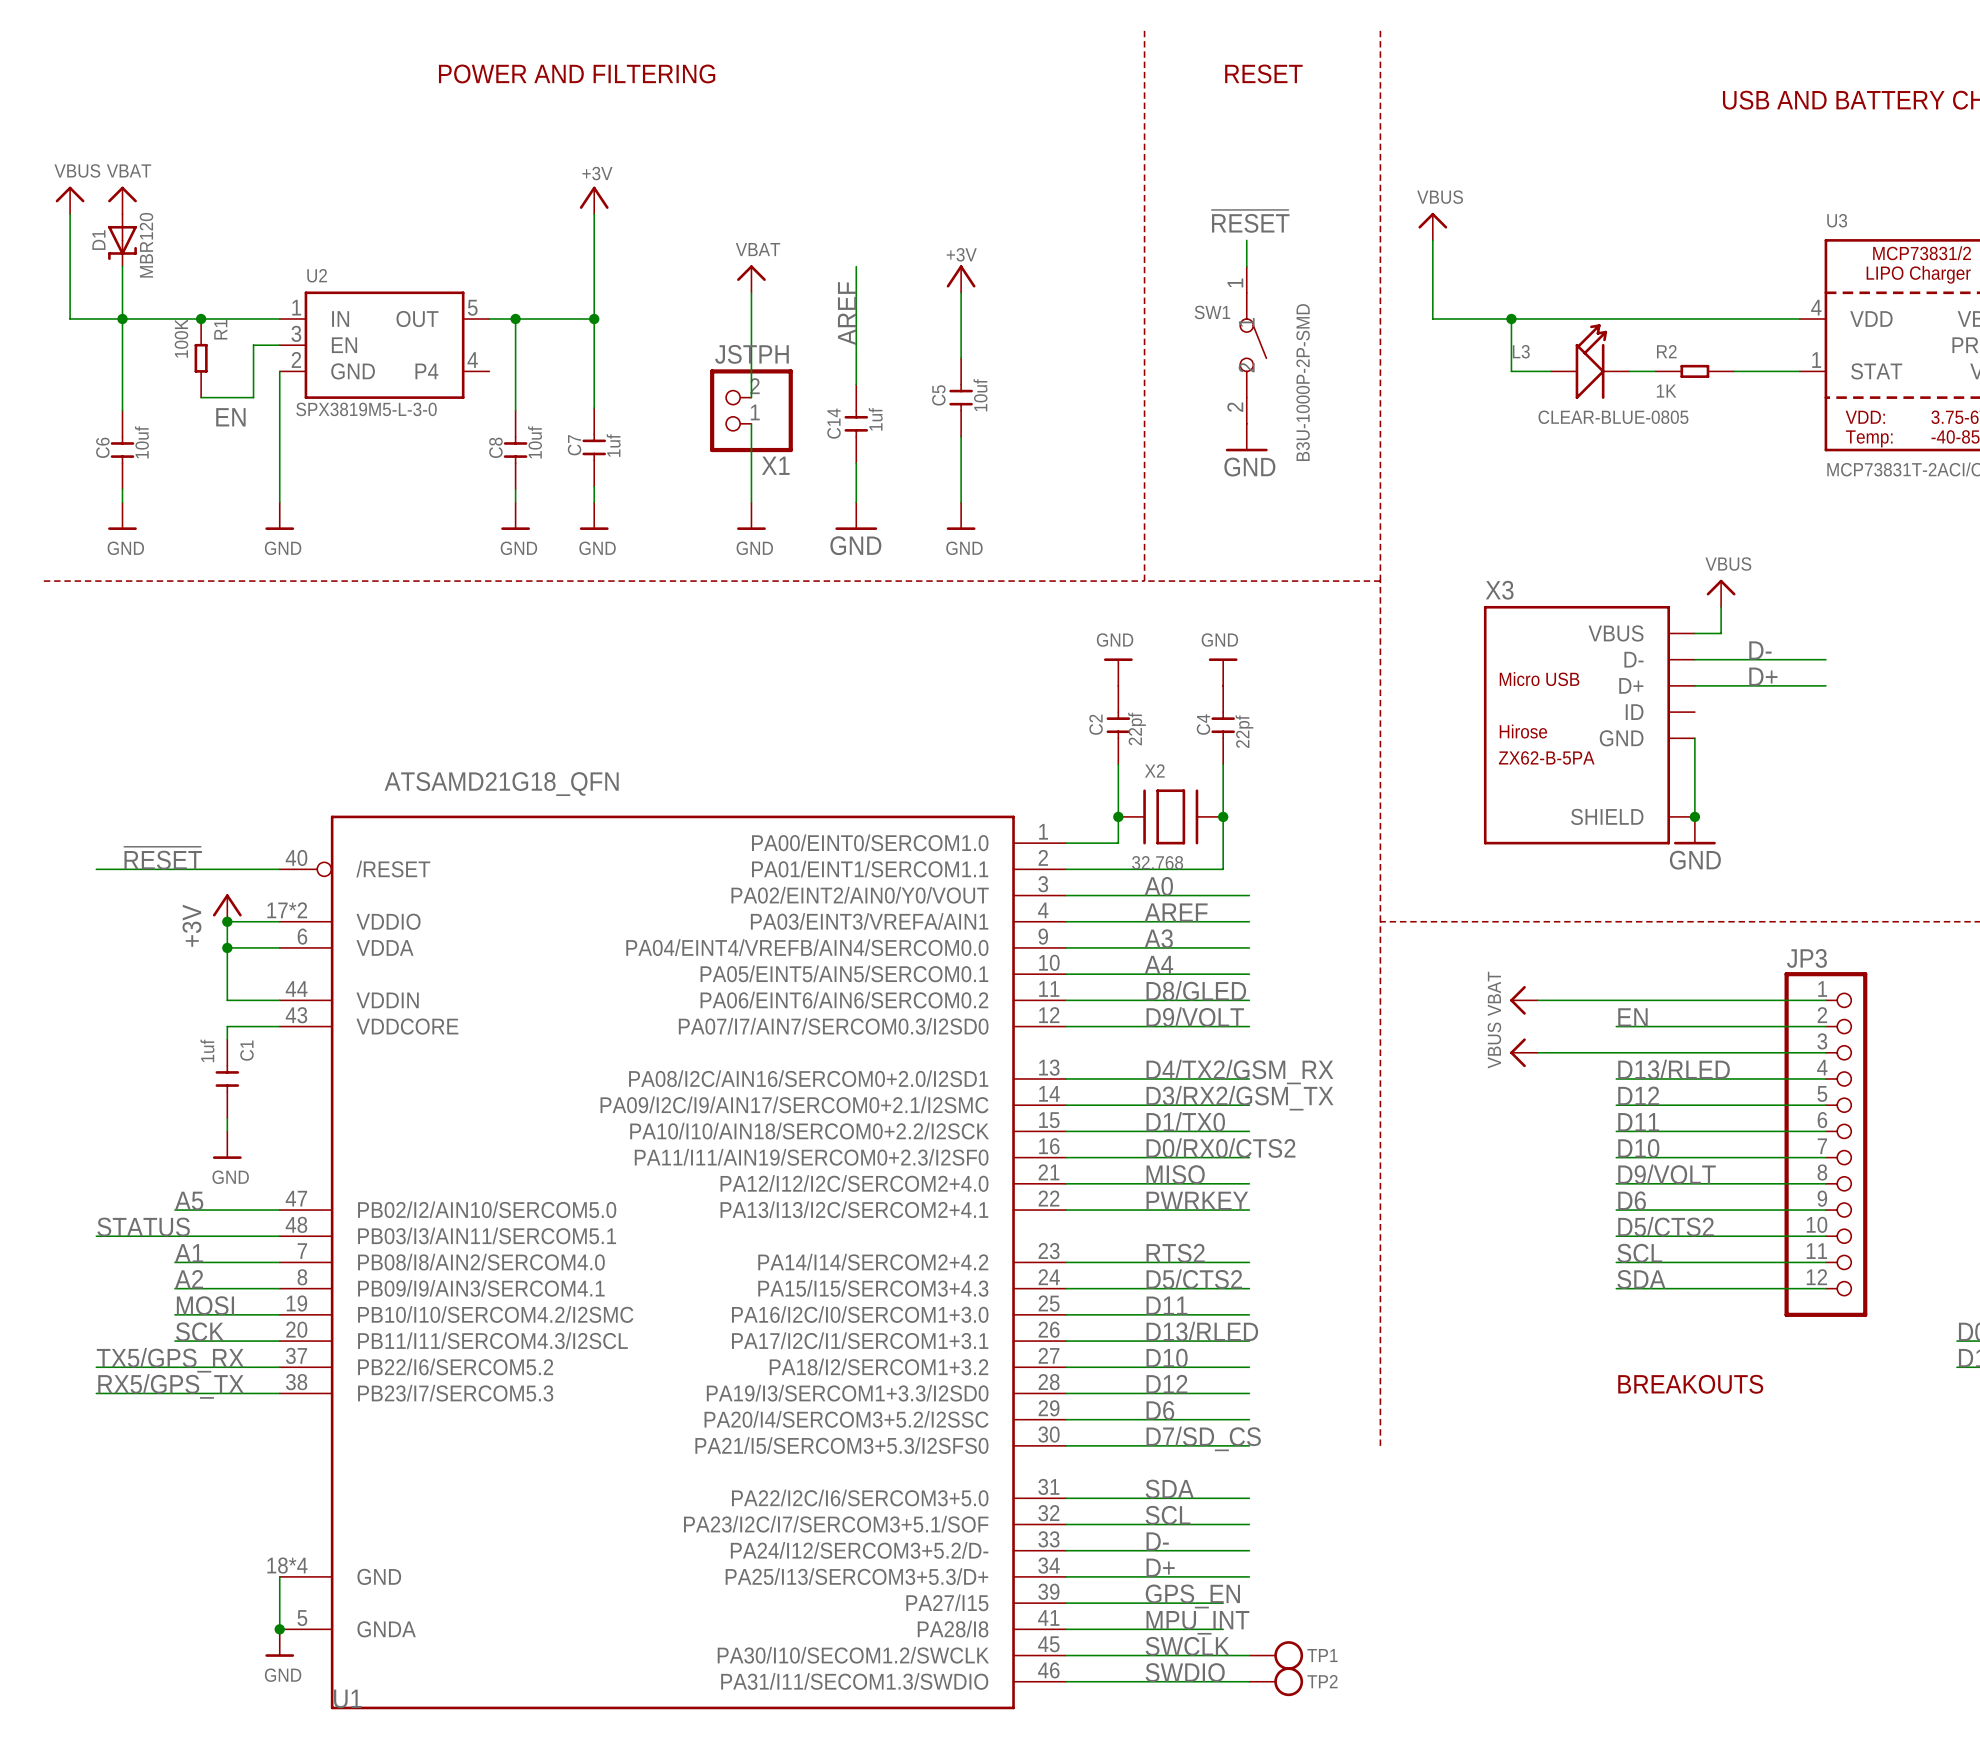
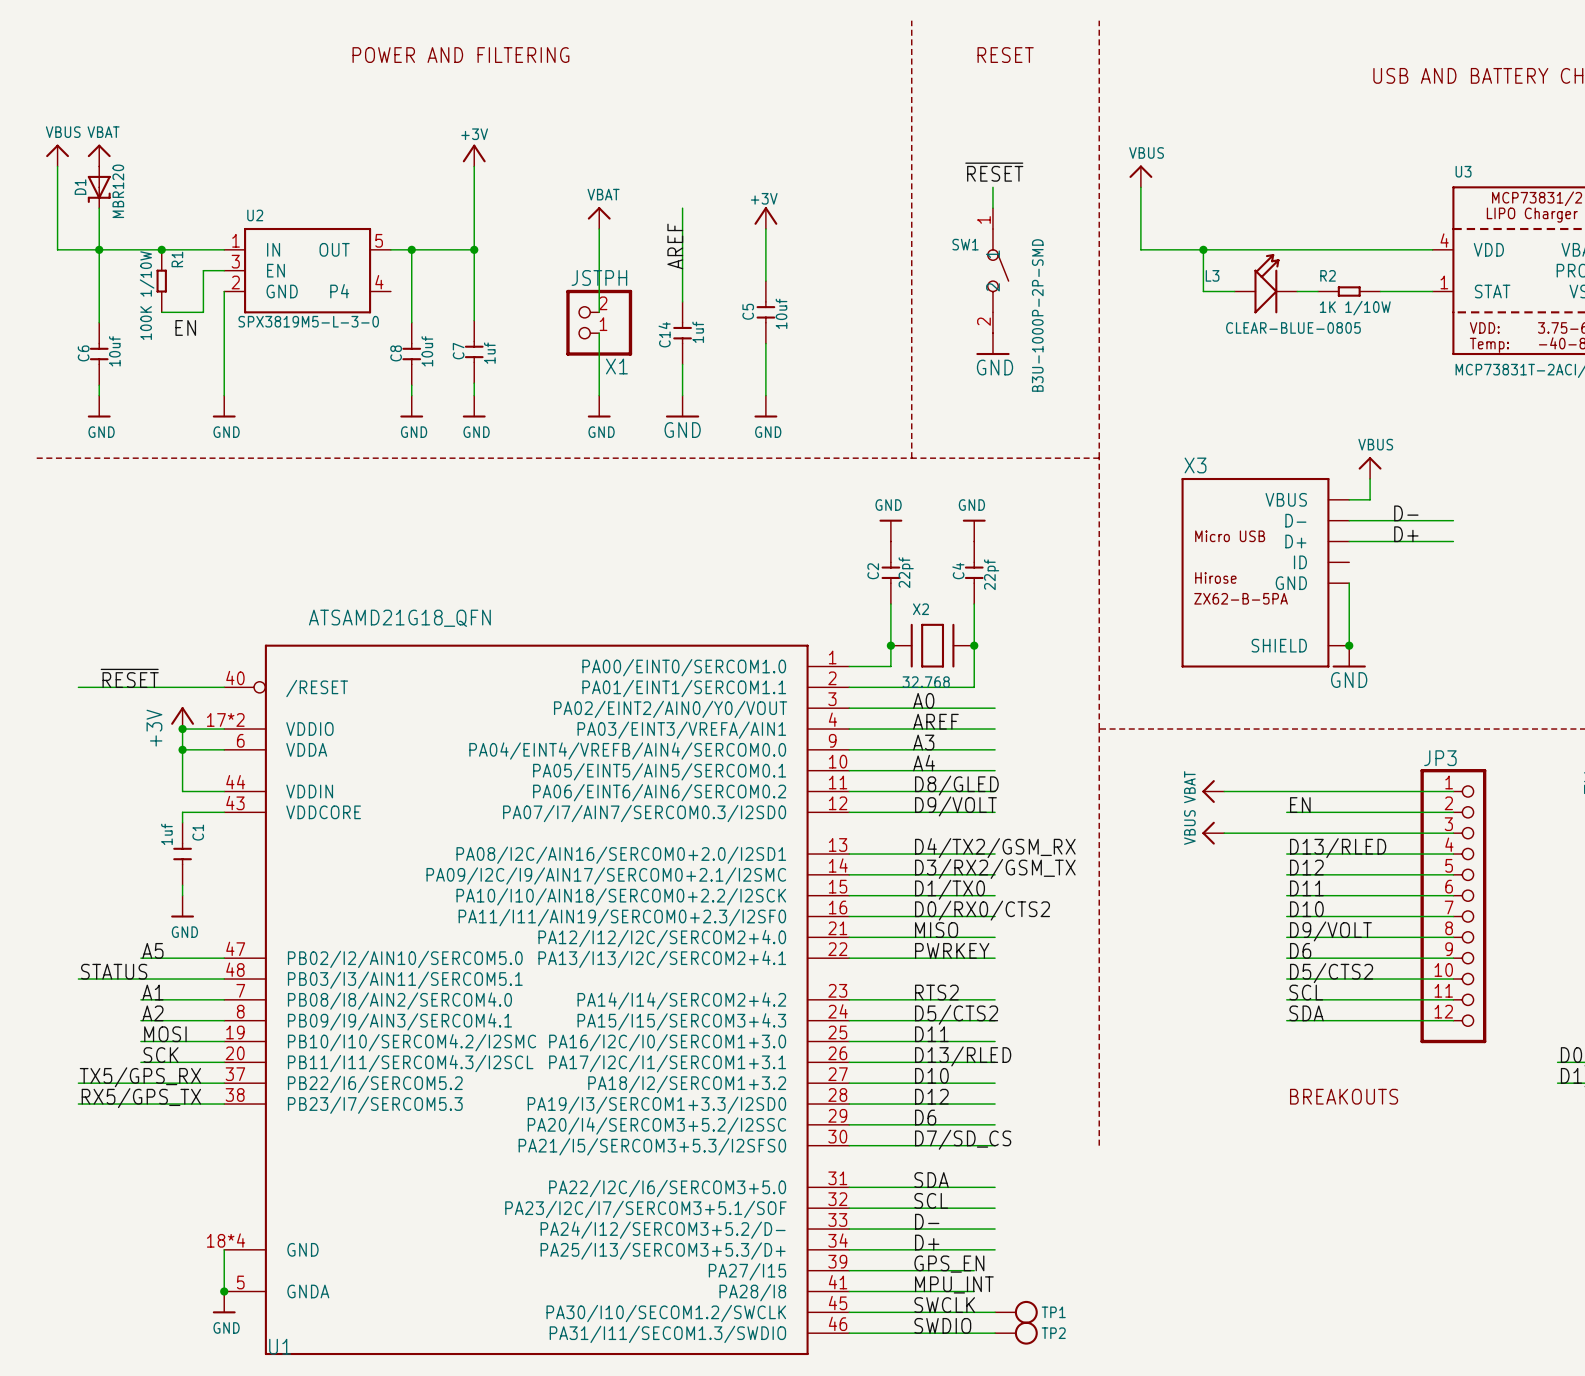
R1 value: 100K (181, 338) -> 100K 1/10W (147, 295)
R2 value: 1K (1666, 391) -> 1K 1/10W (1355, 308)

